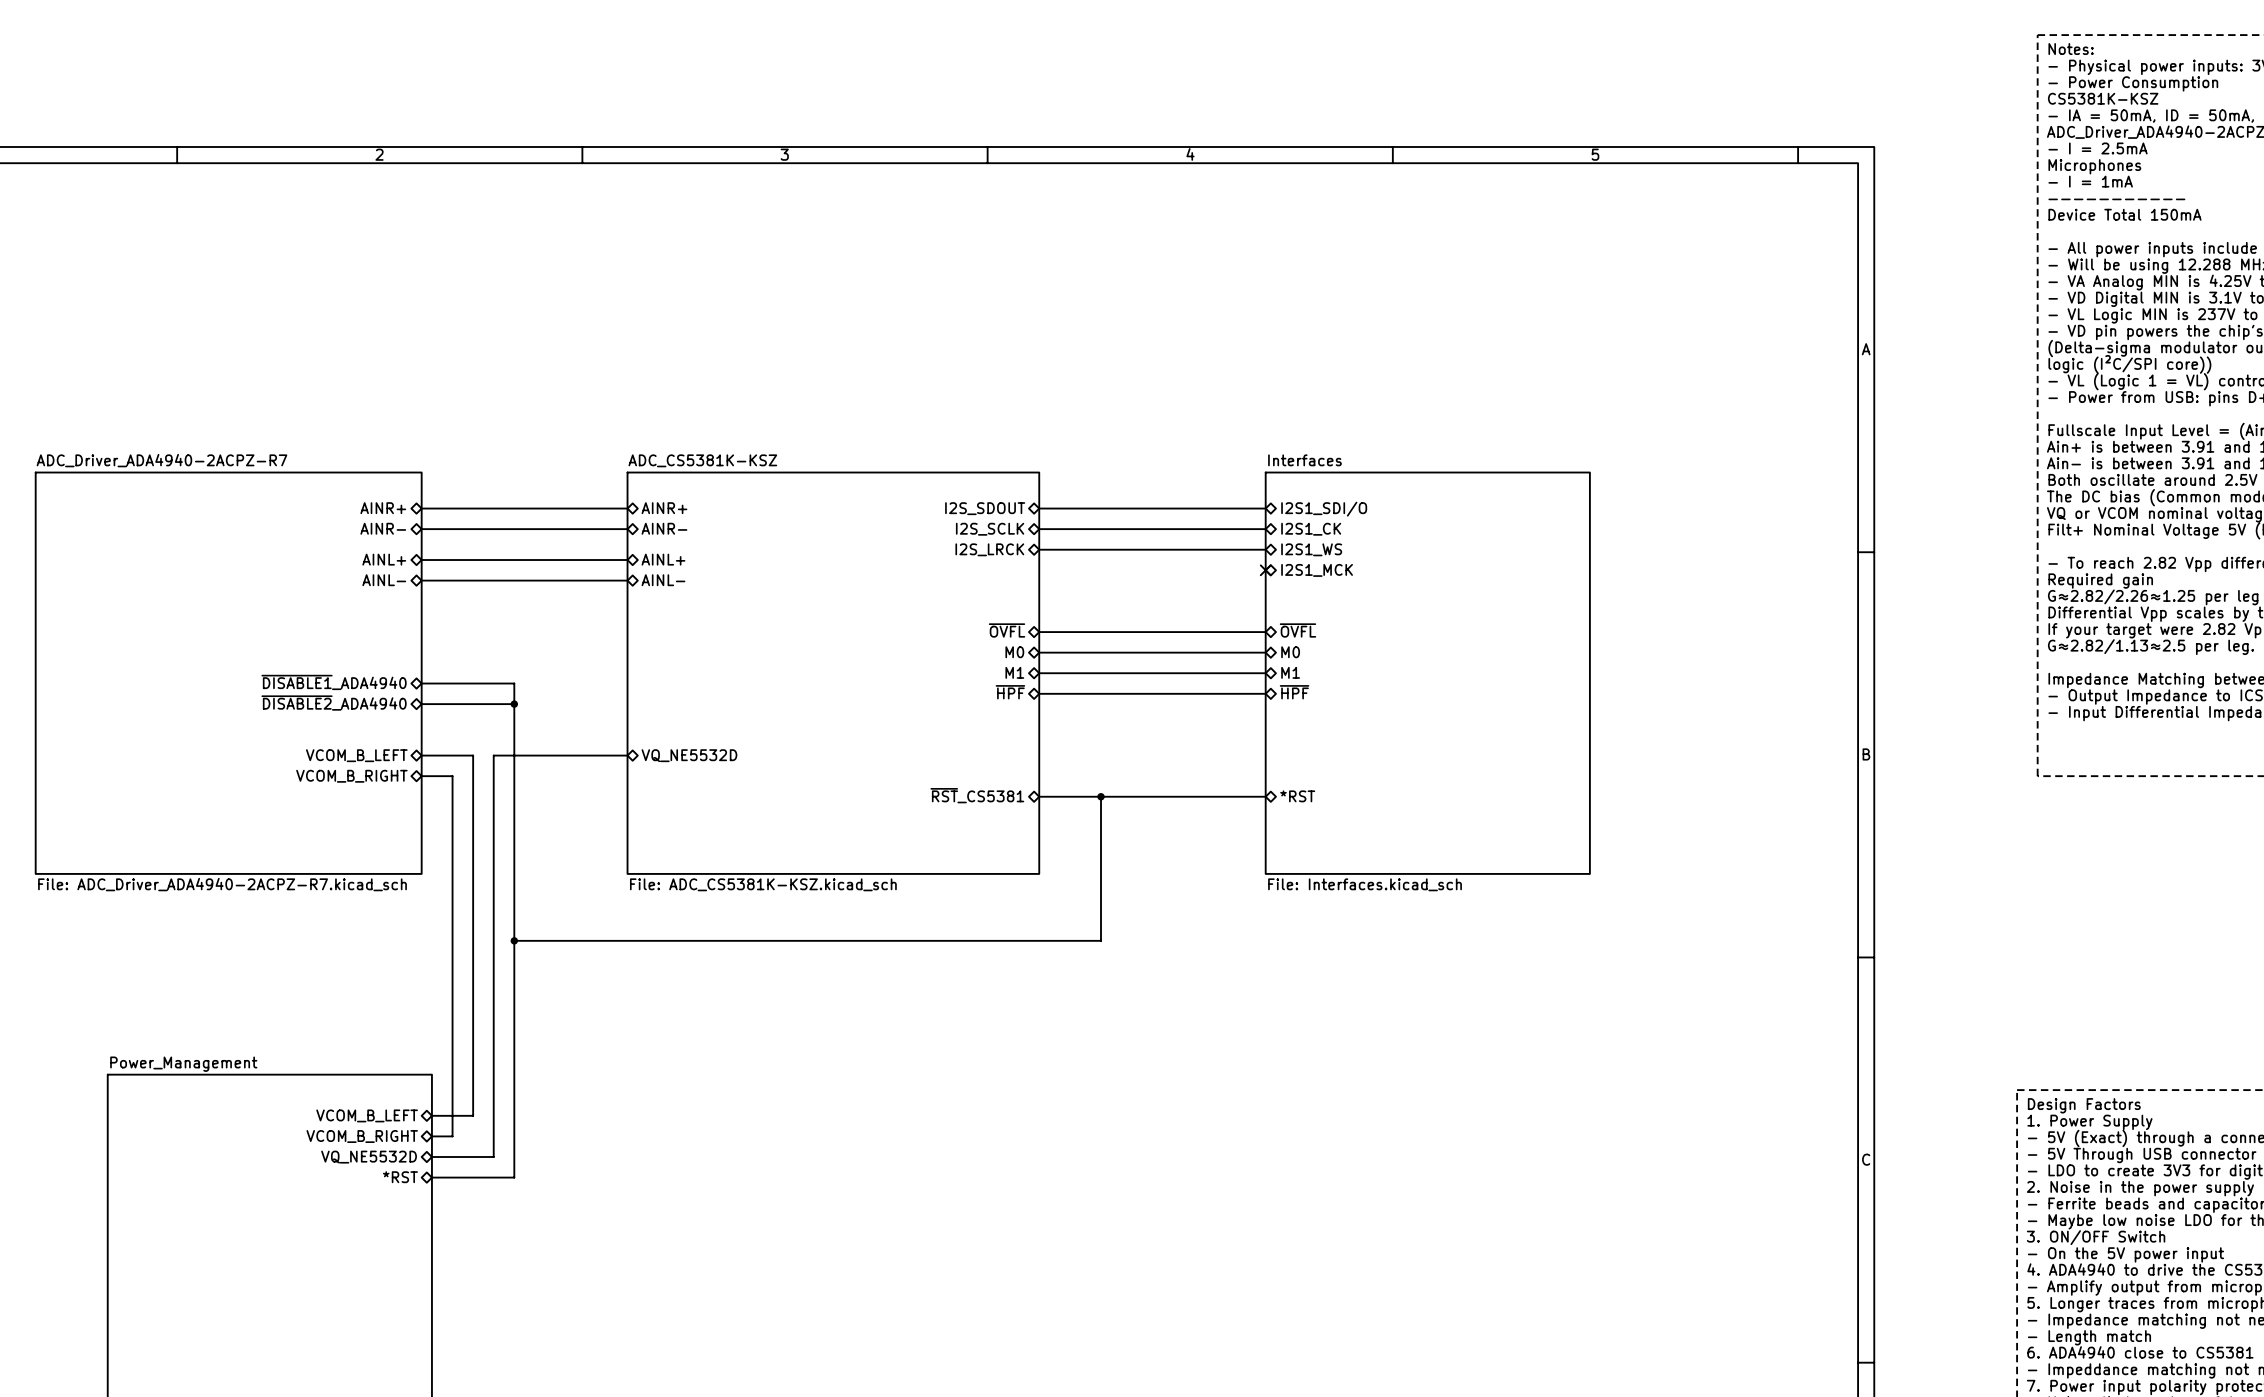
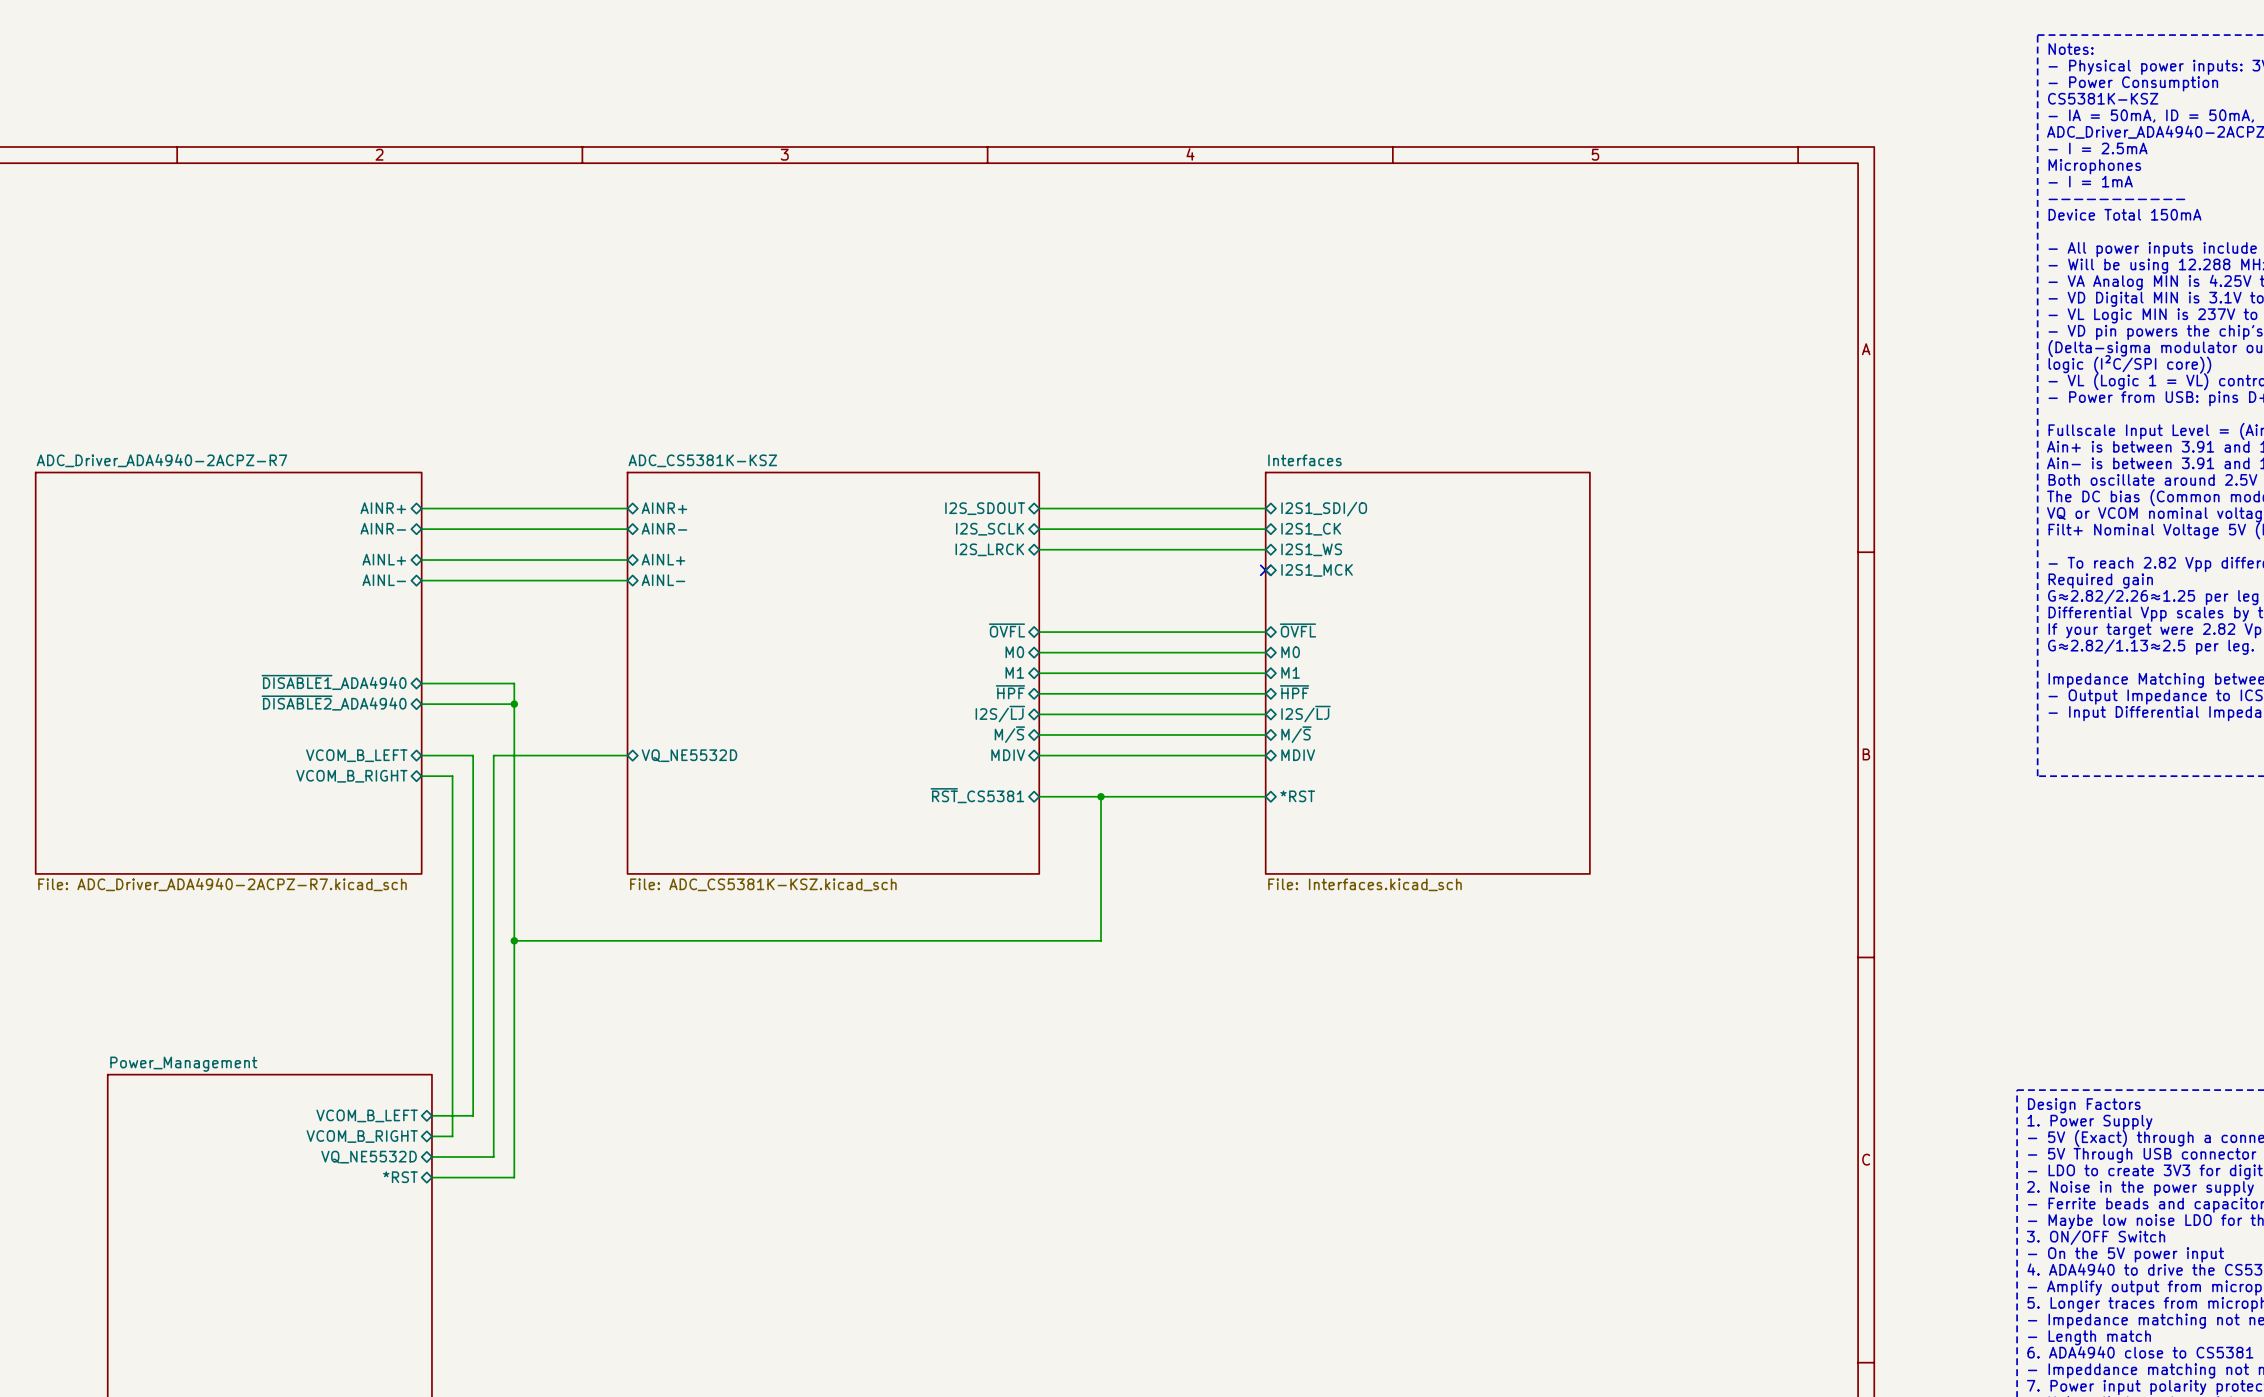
sheet pin: none -> I2S/~{LJ} (1000, 714)
wire: none -> (1039, 714) (1265, 714)
sheet pin: none -> I2S/~{LJ} (1306, 714)
sheet pin: none -> M/~{S} (1009, 734)
wire: none -> (1039, 734) (1265, 734)
sheet pin: none -> M/~{S} (1296, 734)
sheet pin: none -> MDIV (1008, 755)
wire: none -> (1039, 755) (1265, 755)
sheet pin: none -> MDIV (1298, 755)

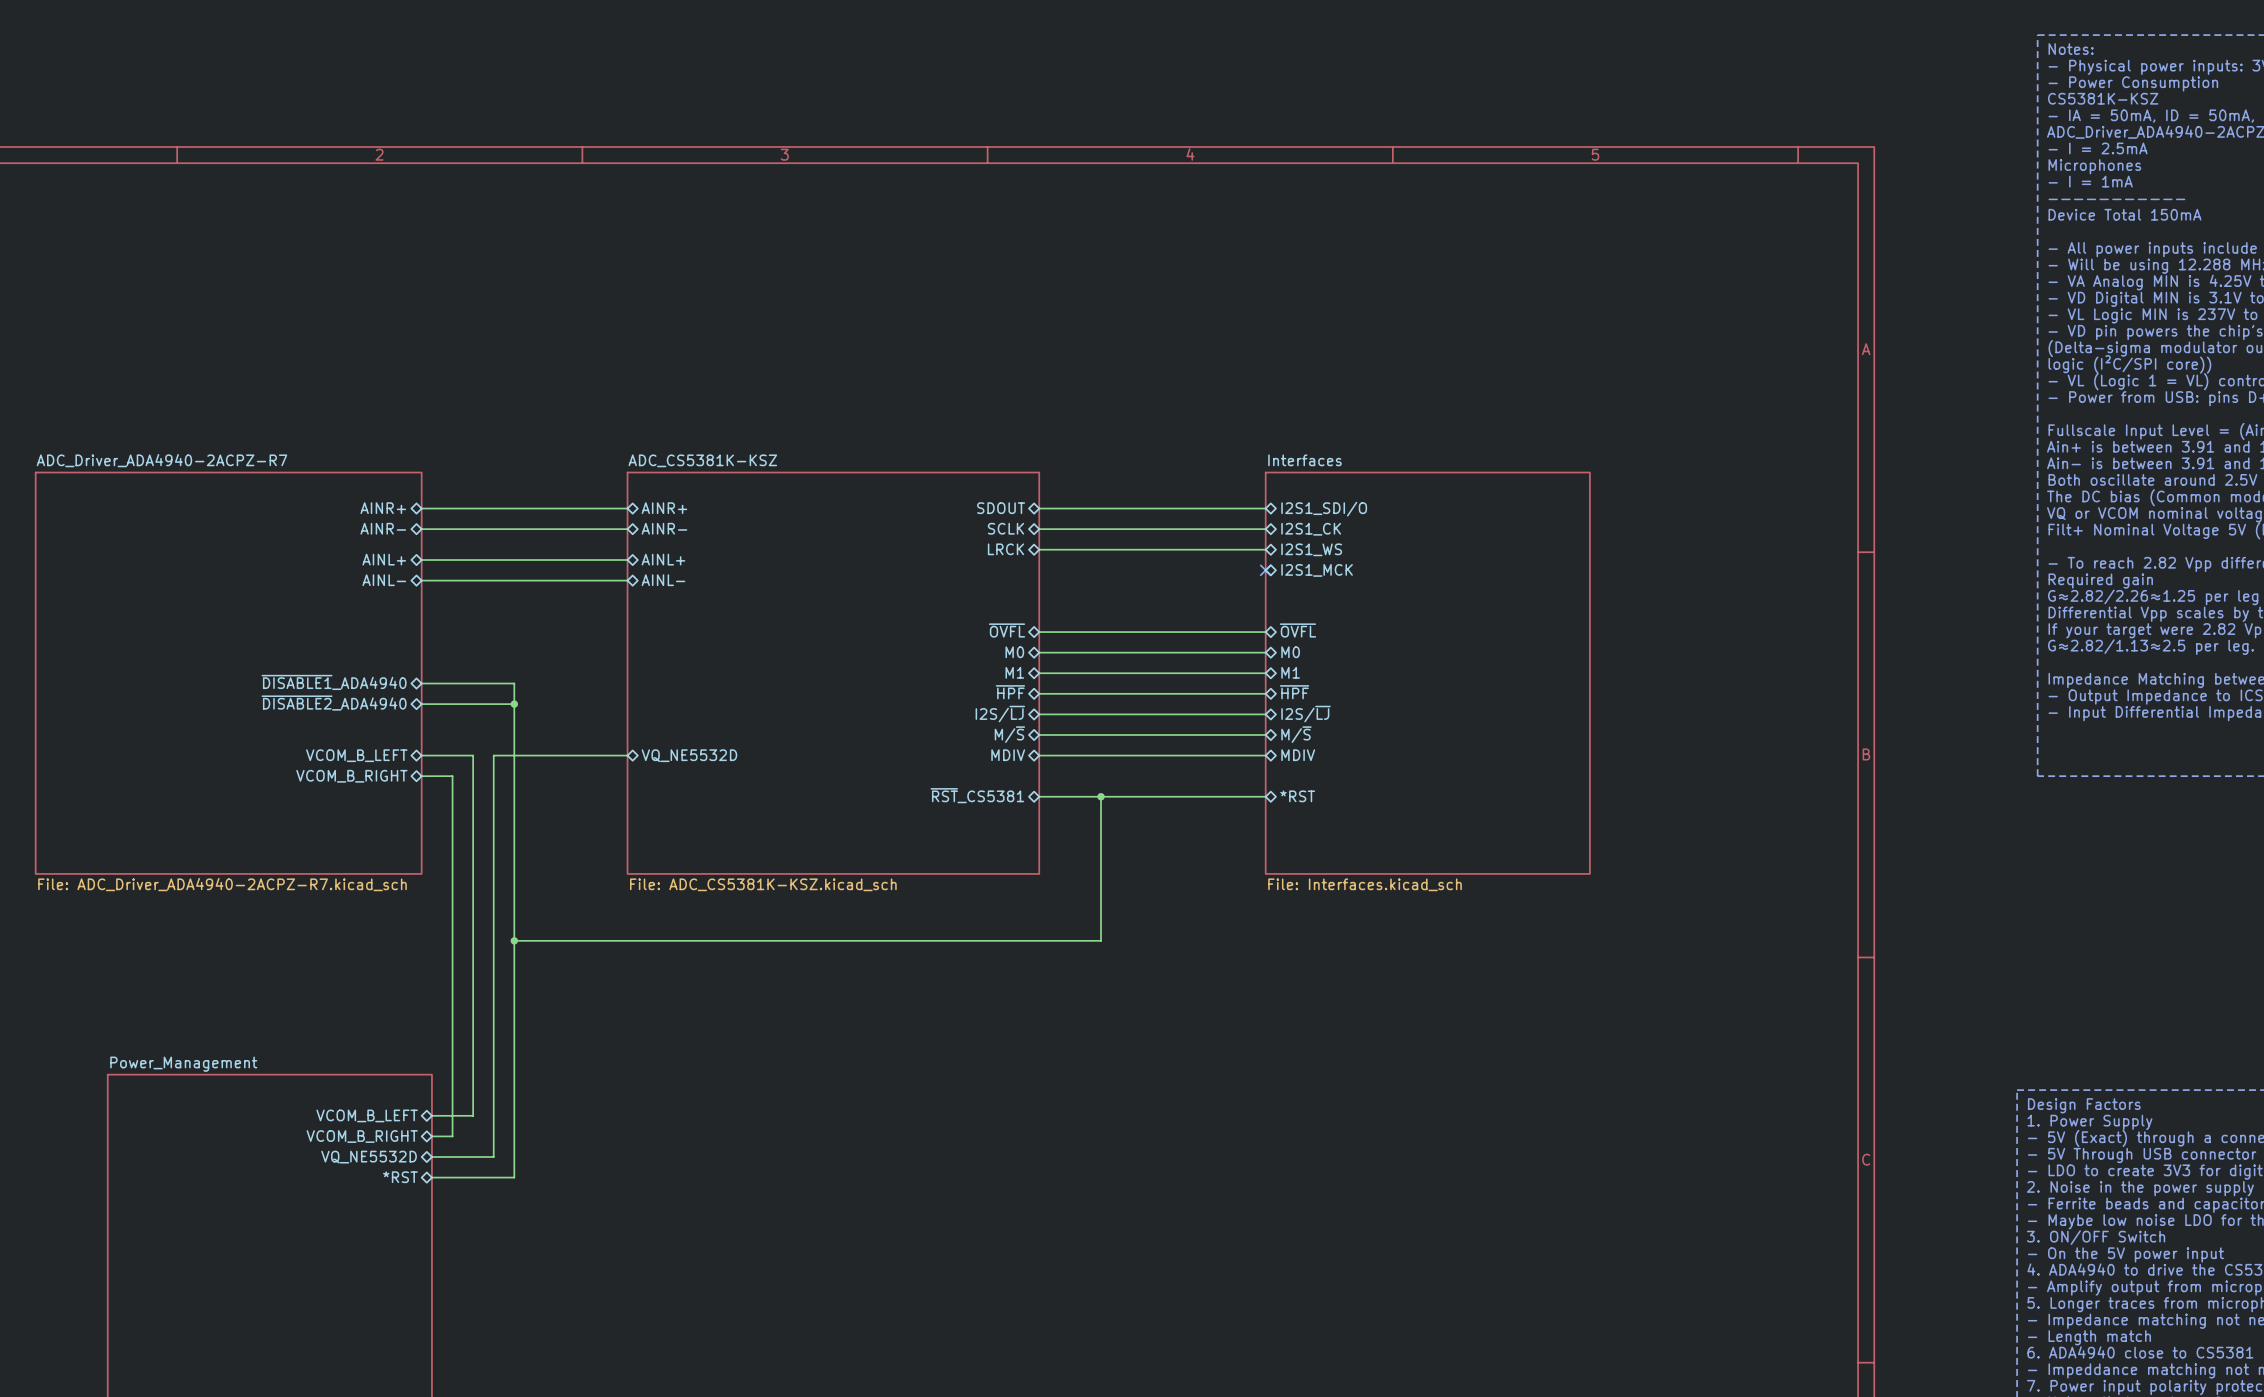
sheet pin: I2S_SDOUT (985, 508) -> SDOUT (1001, 508)
sheet pin: I2S_SCLK (990, 529) -> SCLK (1006, 528)
sheet pin: I2S_LRCK (989, 549) -> LRCK (1006, 549)

